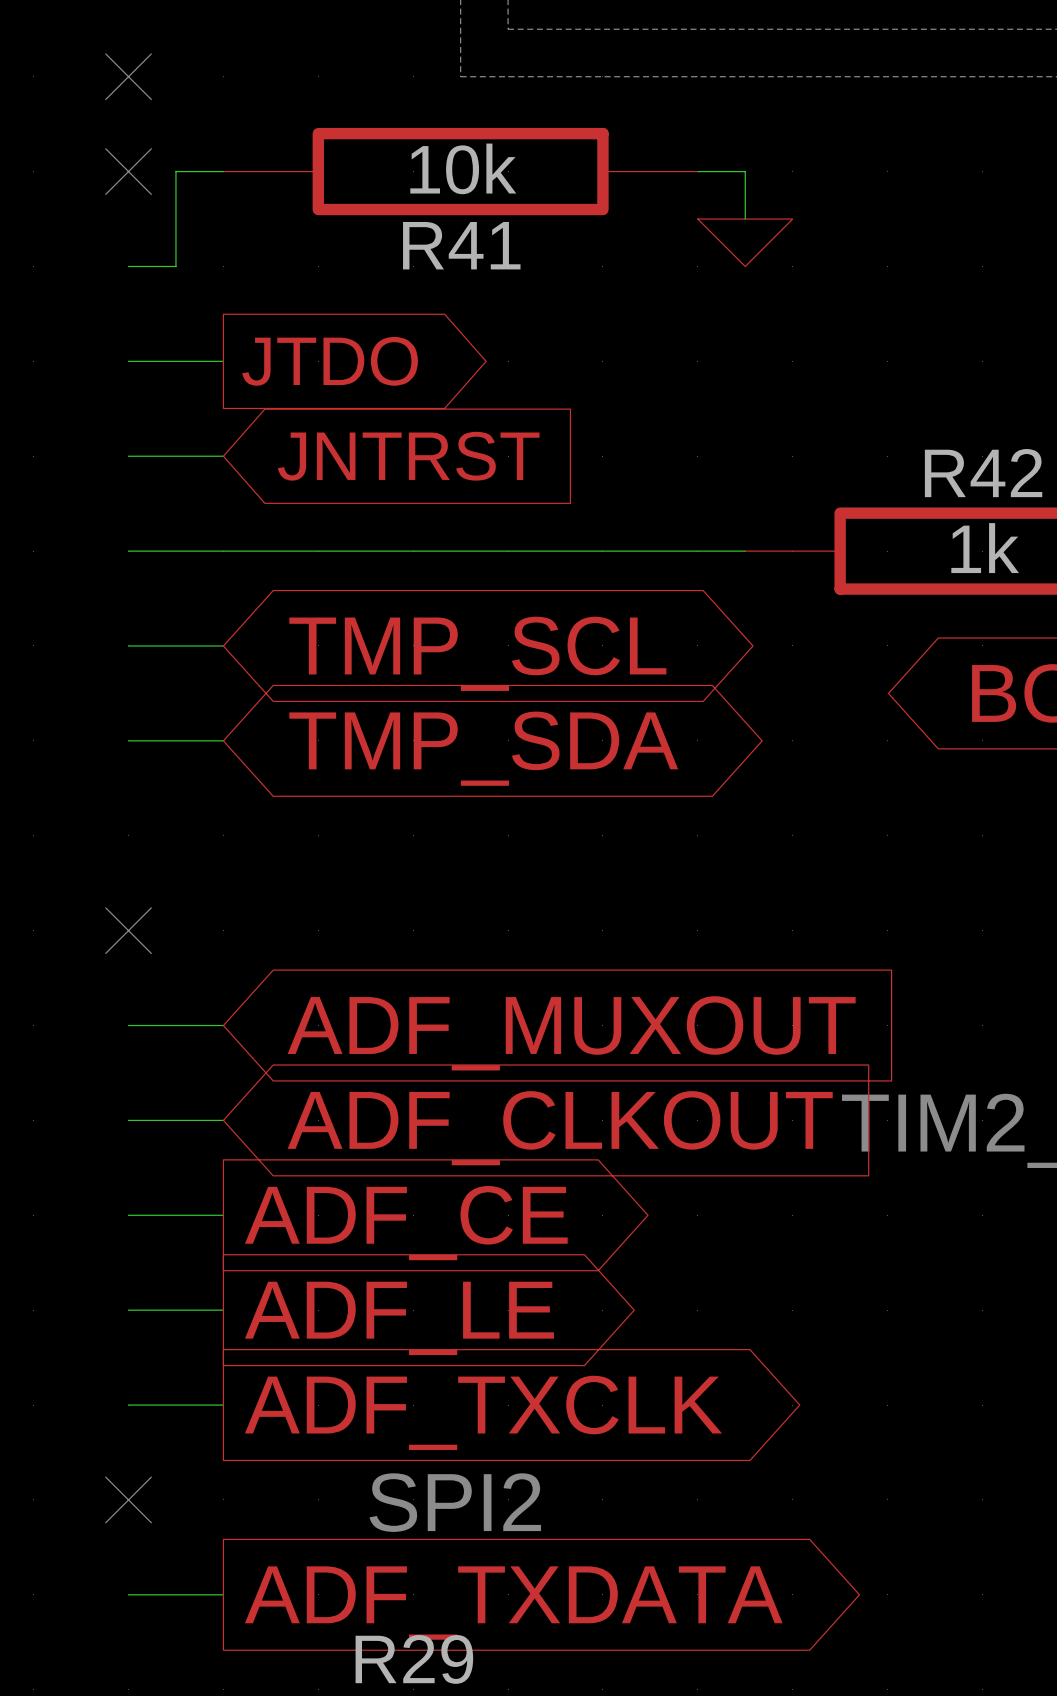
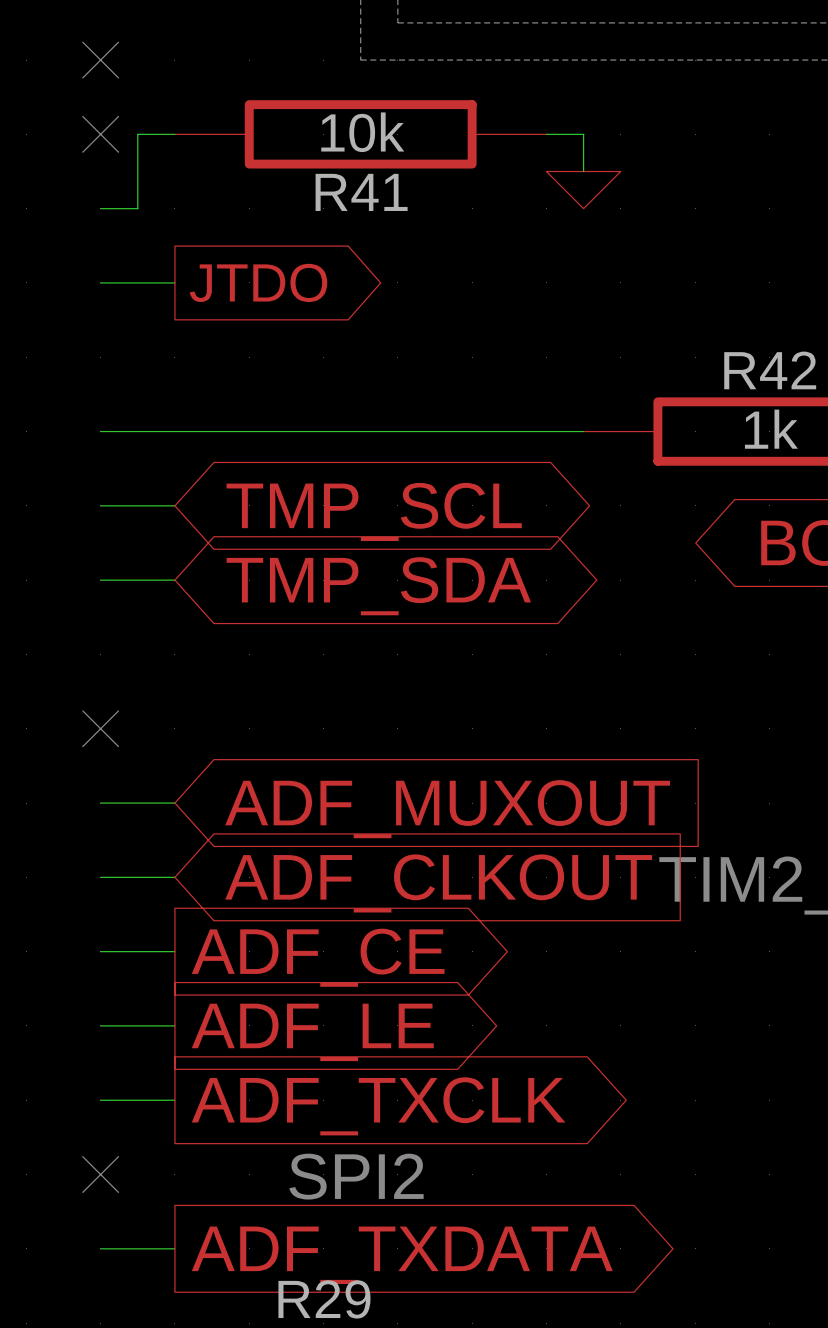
wire: (128, 456) (223, 456) -> none
global label: JNTRST (408, 456) -> none

